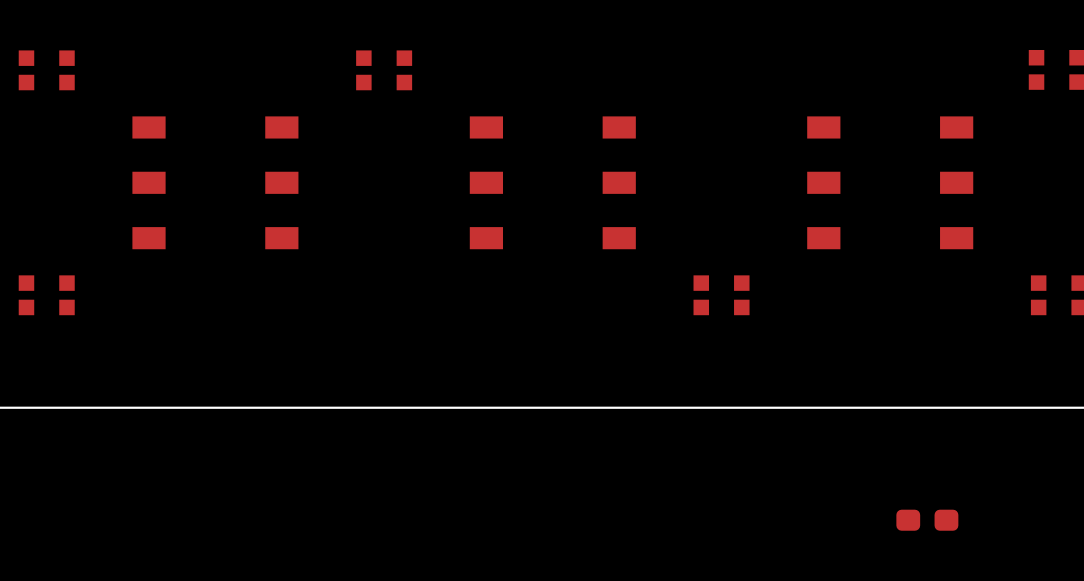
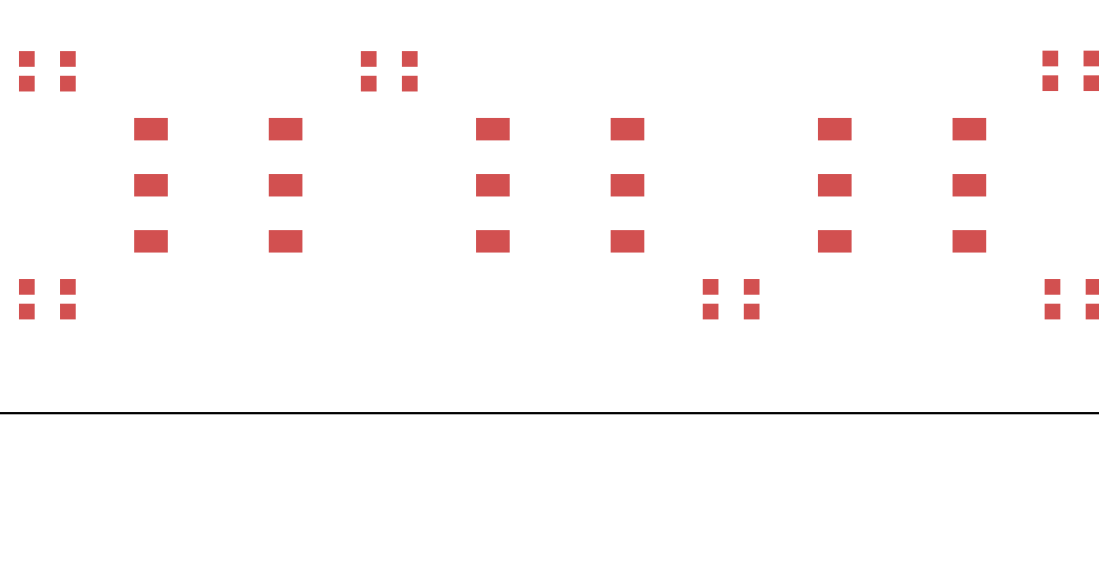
part: (927, 520) -> none

